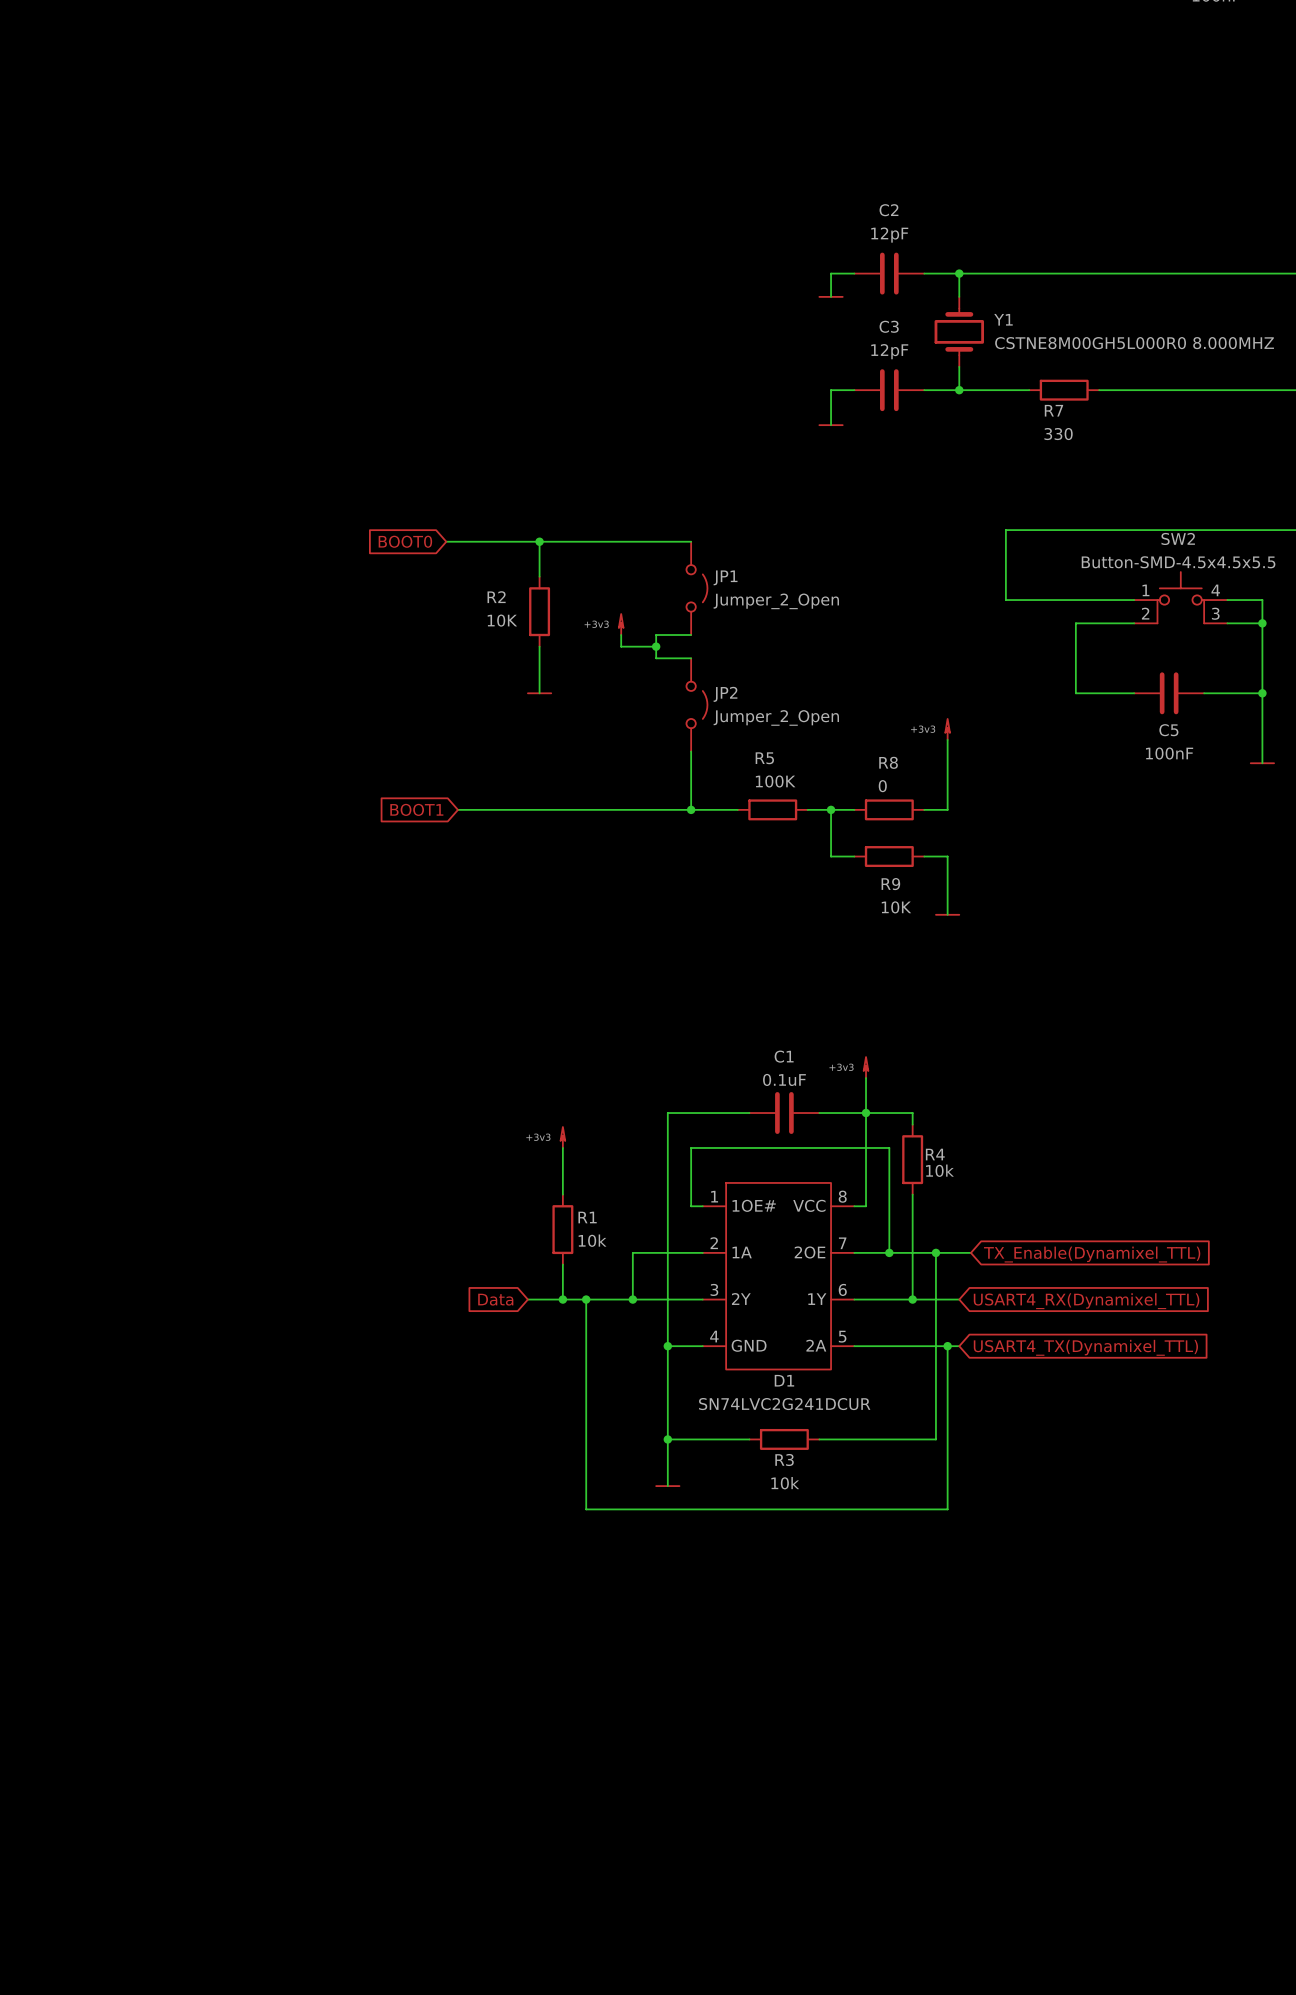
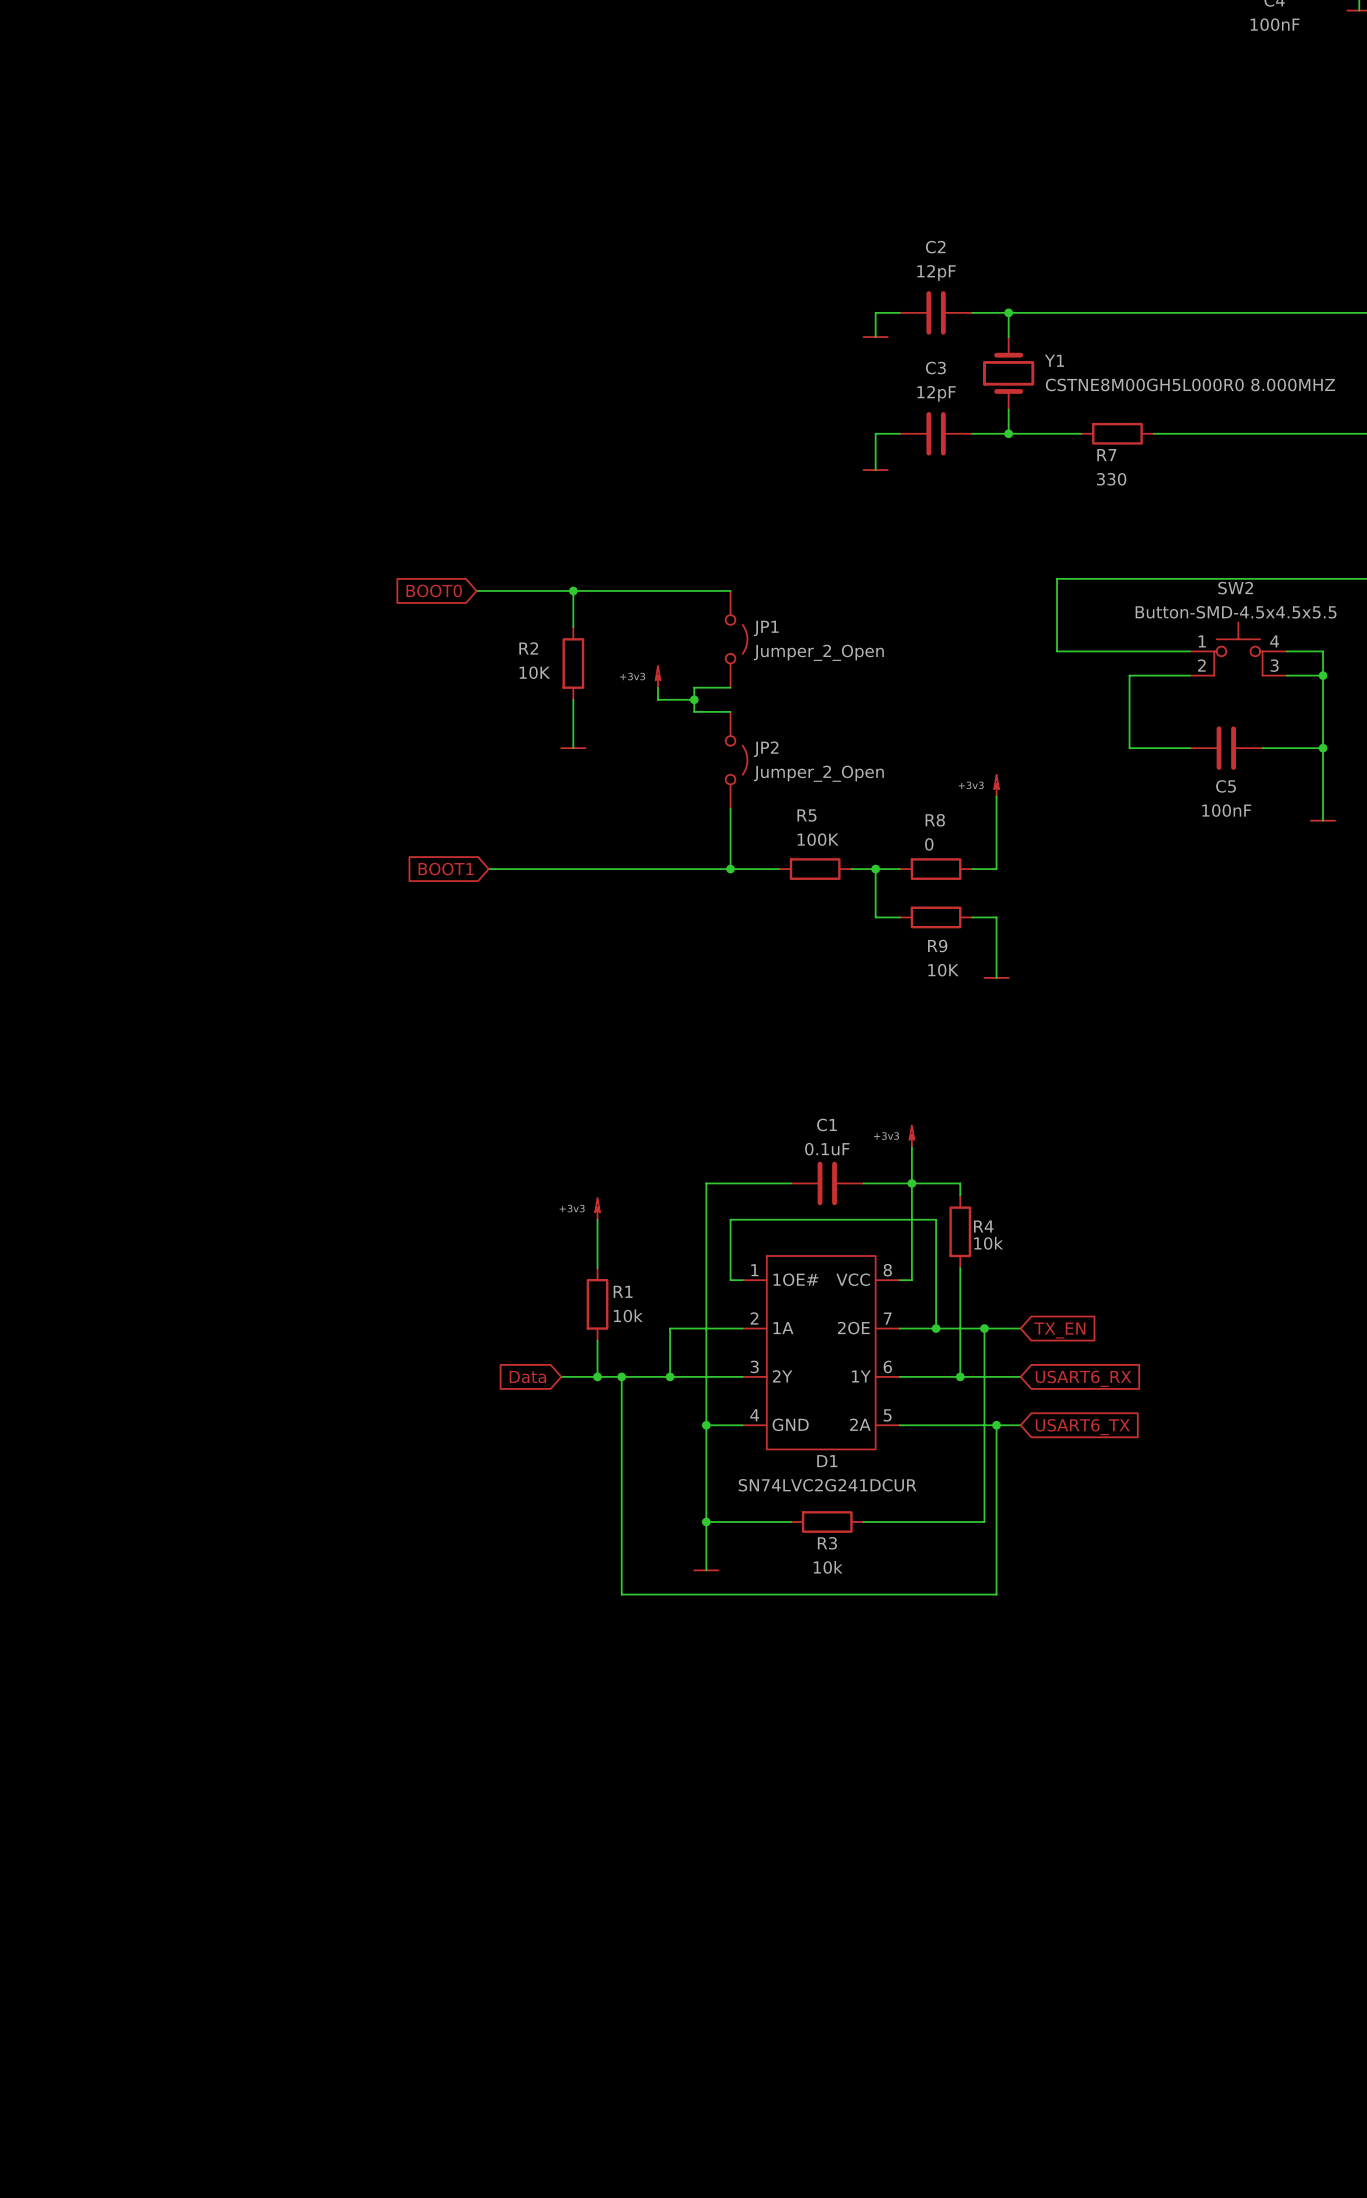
global label: TX_Enable(Dynamixel_TTL) (1092, 1254) -> TX_EN (1059, 1330)
wire: none -> (1008, 1376) (1020, 1376)
global label: none -> USART6_RX (1083, 1378)
global label: USART4_RX(Dynamixel_TTL) (1086, 1301) -> none
wire: none -> (1008, 1425) (1020, 1425)
global label: none -> USART6_TX (1082, 1427)
global label: USART4_TX(Dynamixel_TTL) (1085, 1347) -> none

